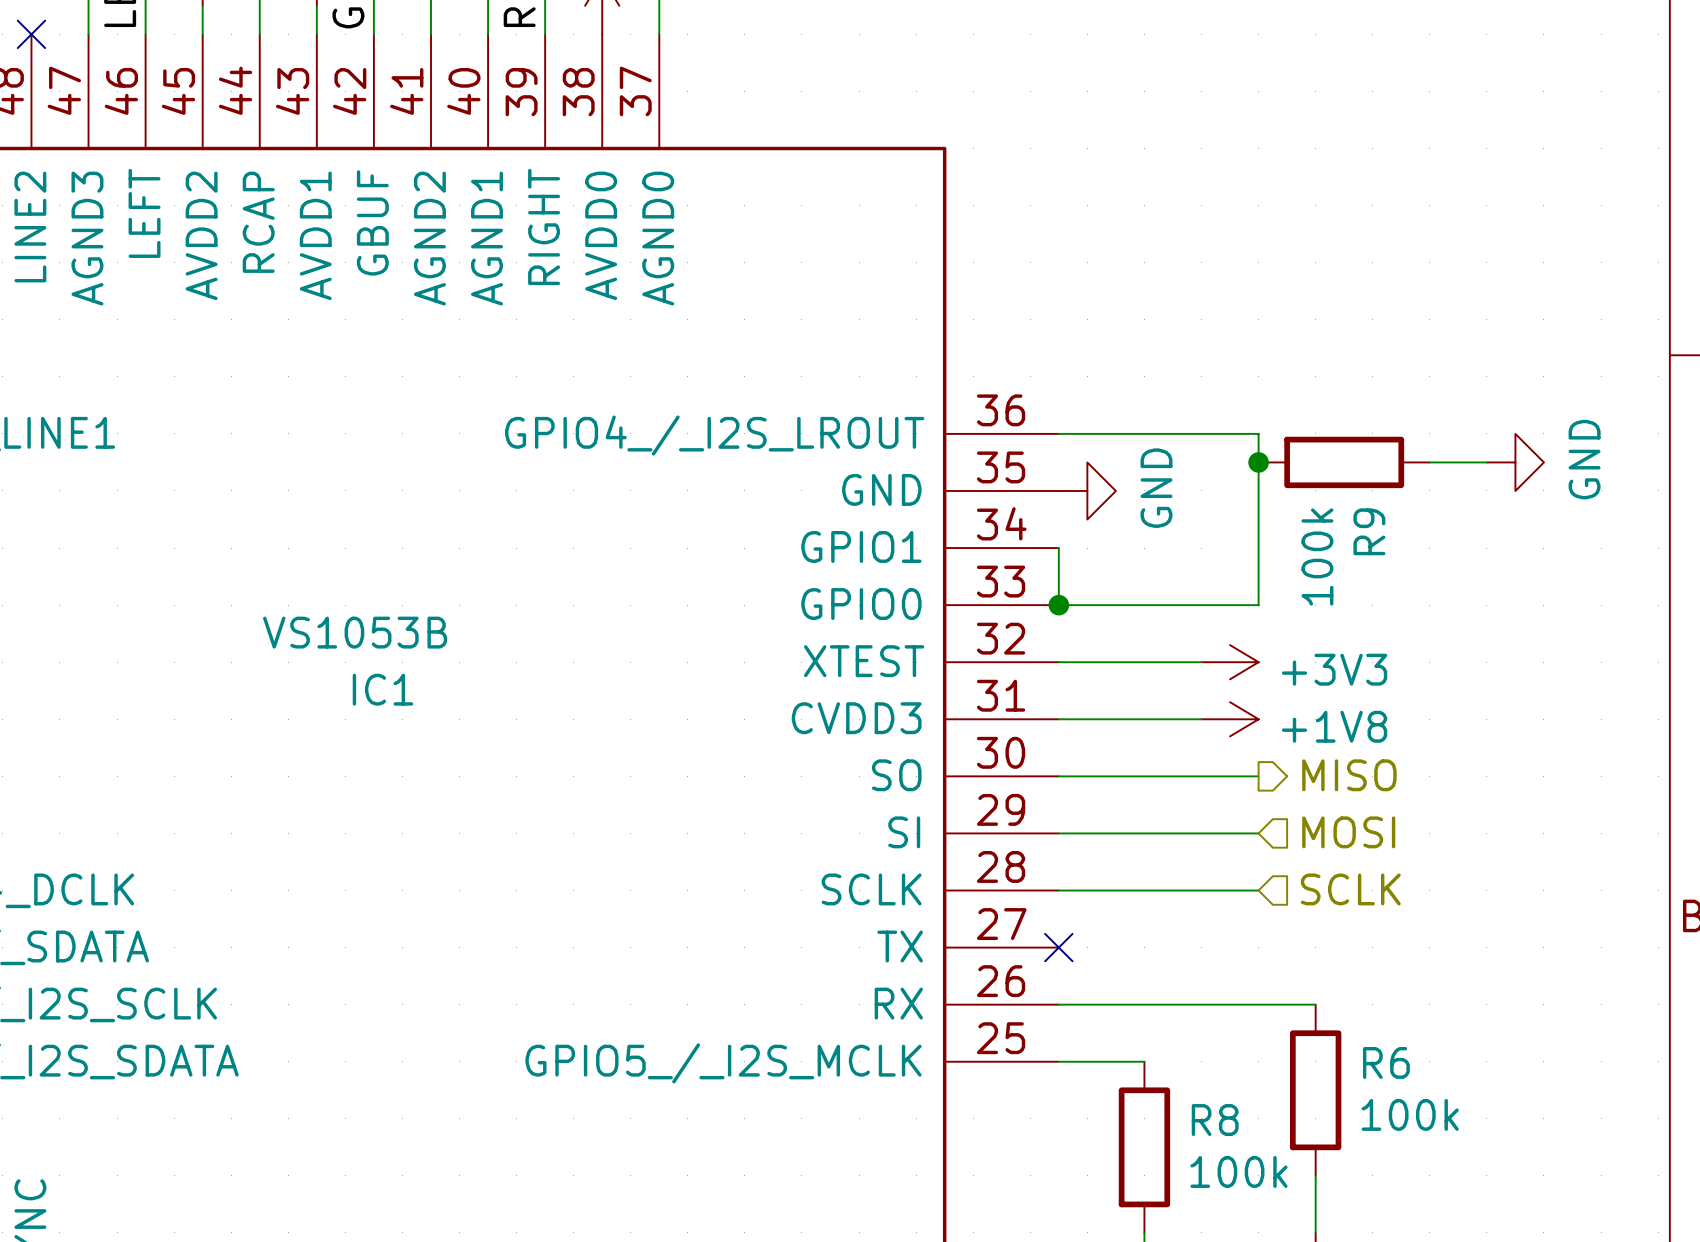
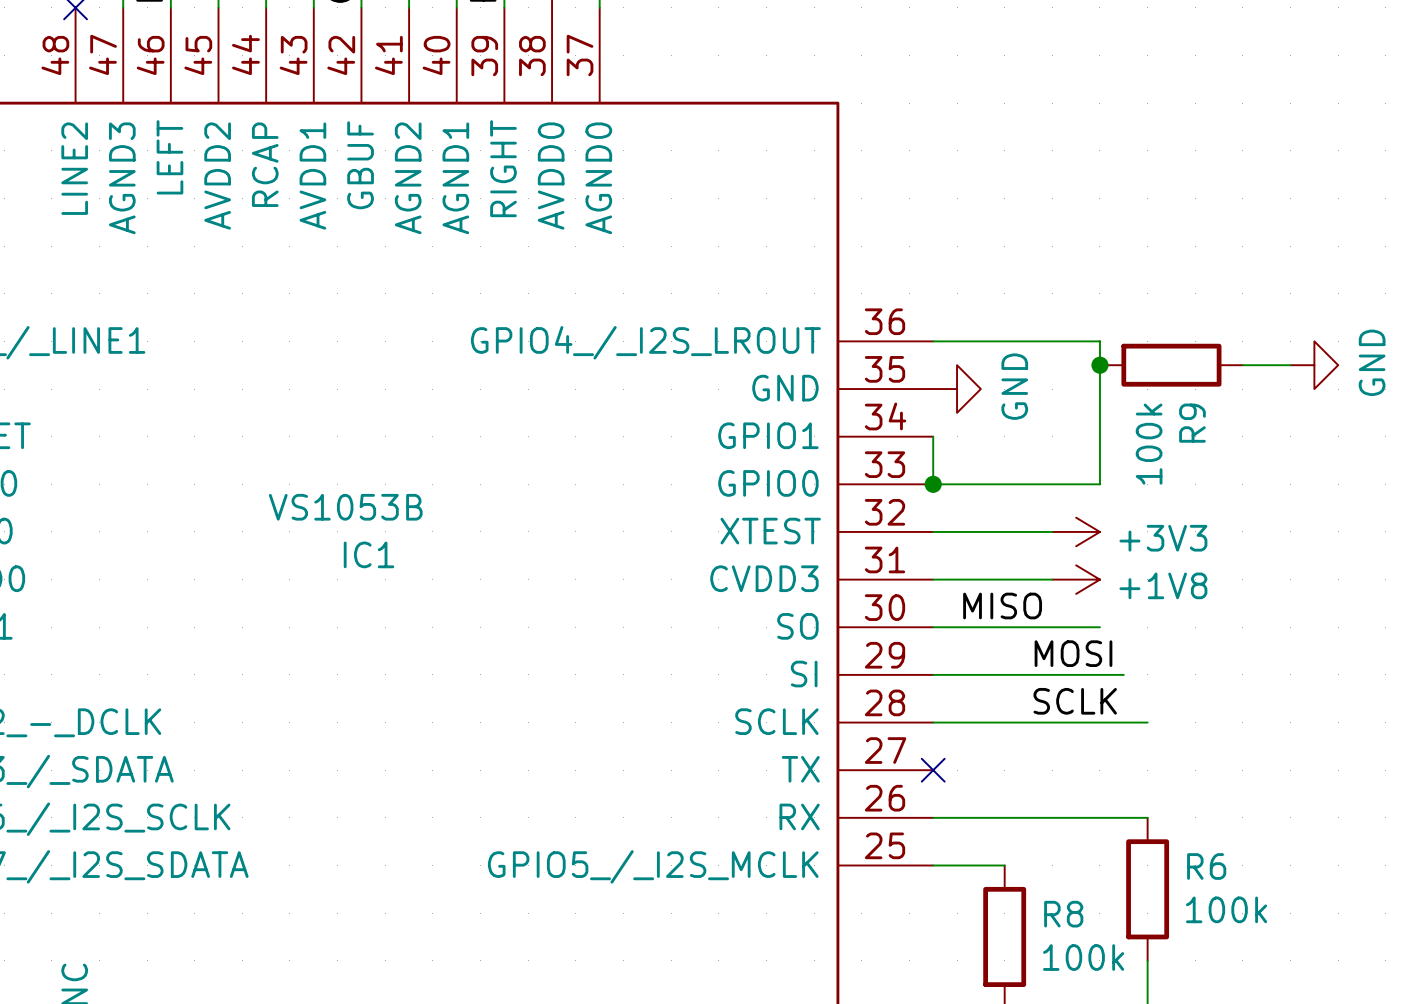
label: none -> MISO (1002, 606)
hierarchical label: MISO (1349, 775) -> none
label: none -> MOSI (1073, 653)
hierarchical label: MOSI (1348, 832) -> none
wire: none -> (1099, 674) (1123, 674)
label: none -> SCLK (1075, 701)
hierarchical label: SCLK (1350, 889) -> none
wire: none -> (1099, 722) (1147, 722)

